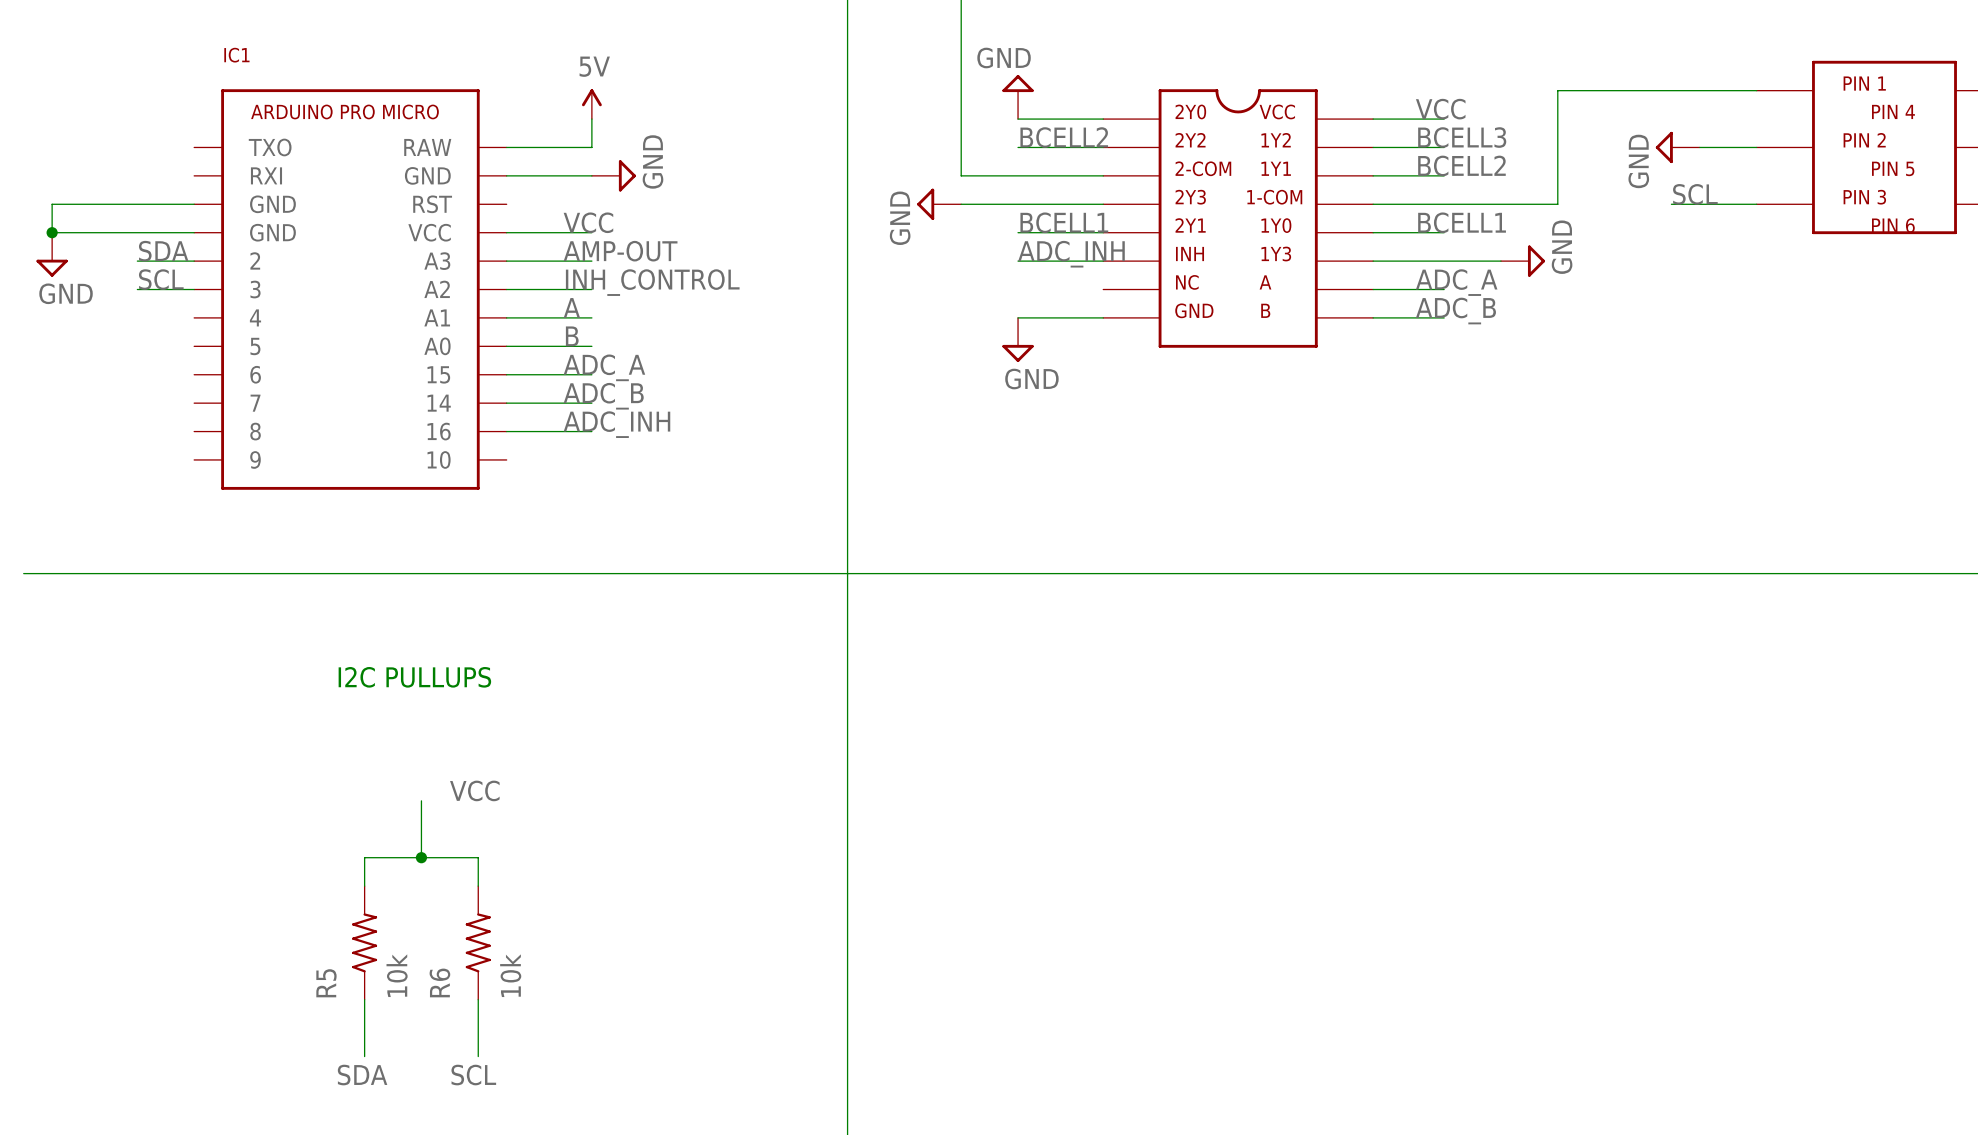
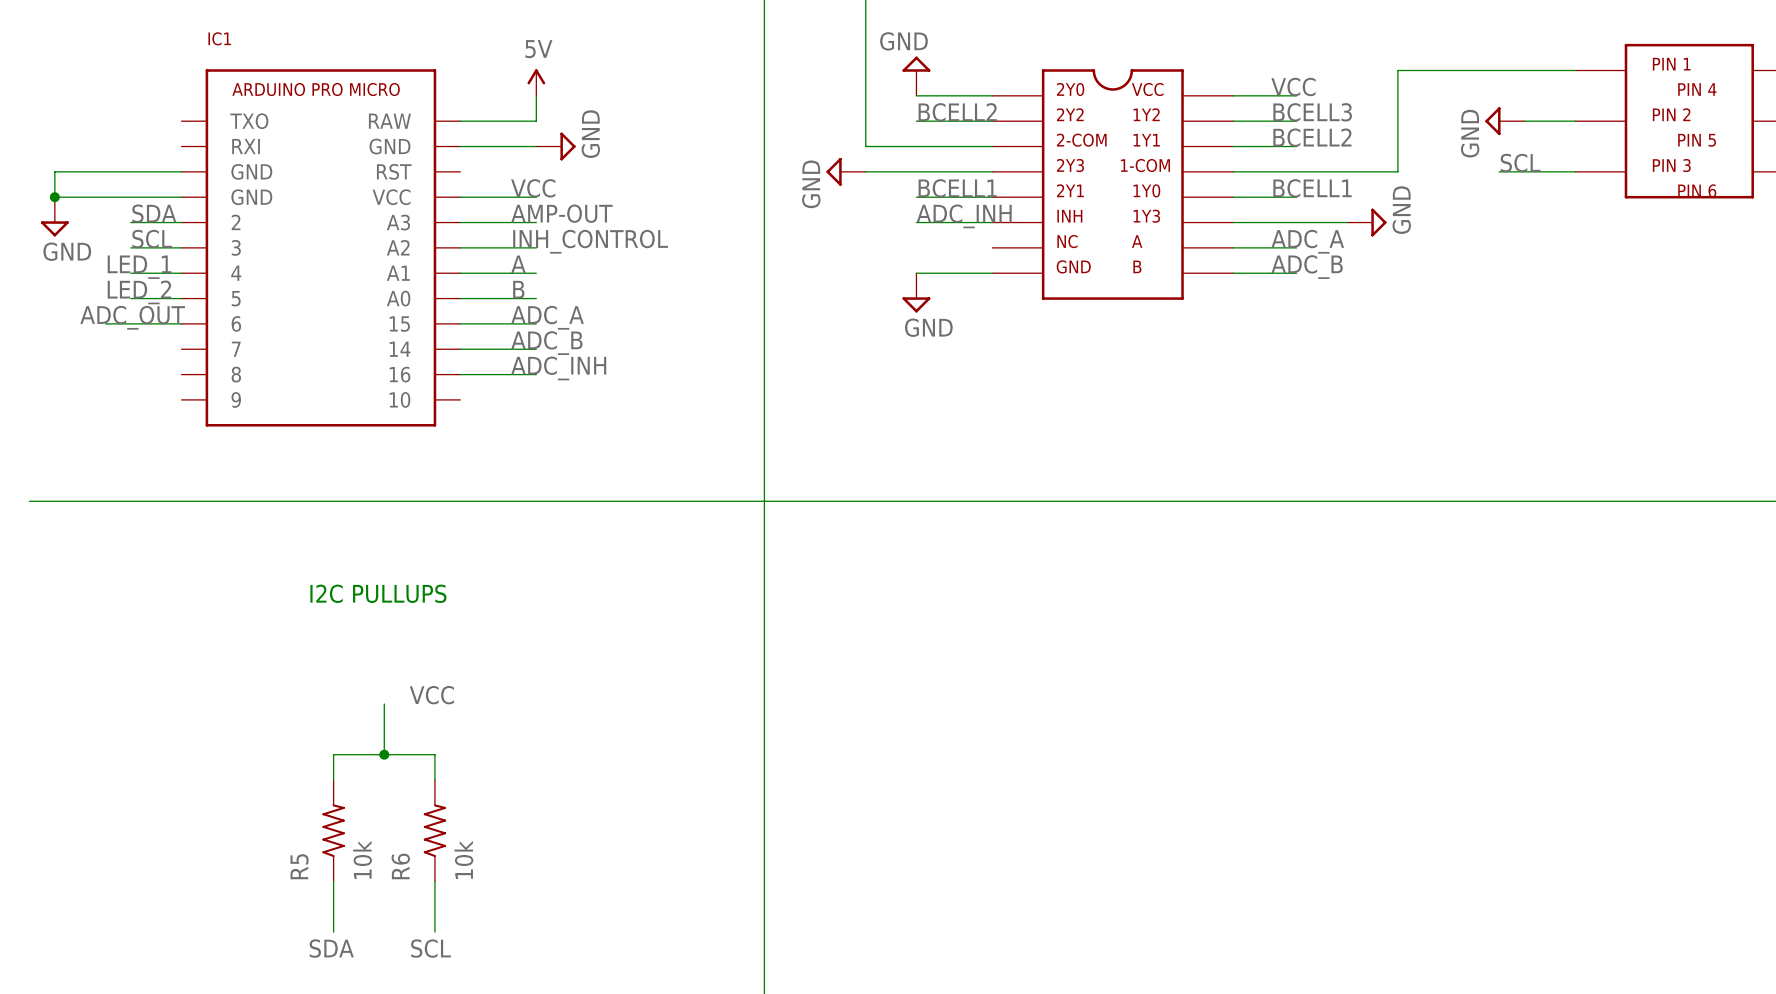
label: none -> LED_1 (139, 267)
wire: none -> (130, 273) (181, 273)
label: none -> LED_2 (139, 292)
wire: none -> (130, 298) (181, 298)
label: none -> ADC_OUT (132, 317)
wire: none -> (105, 323) (181, 323)

